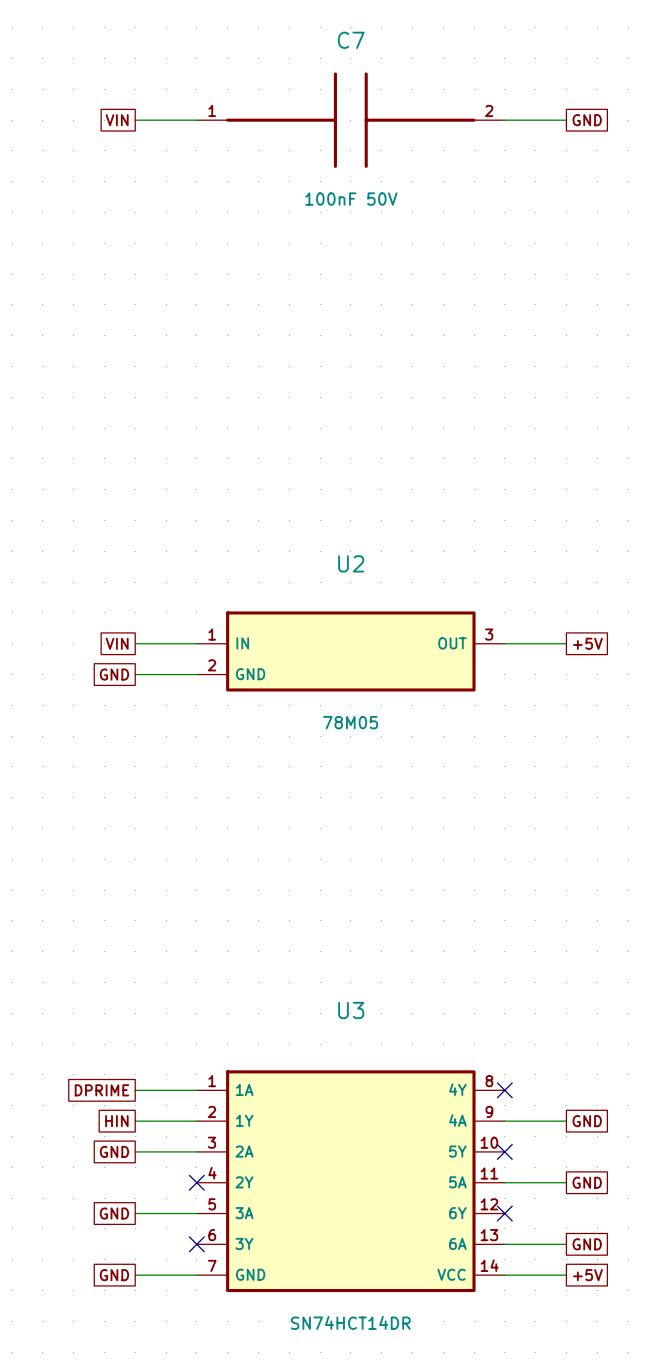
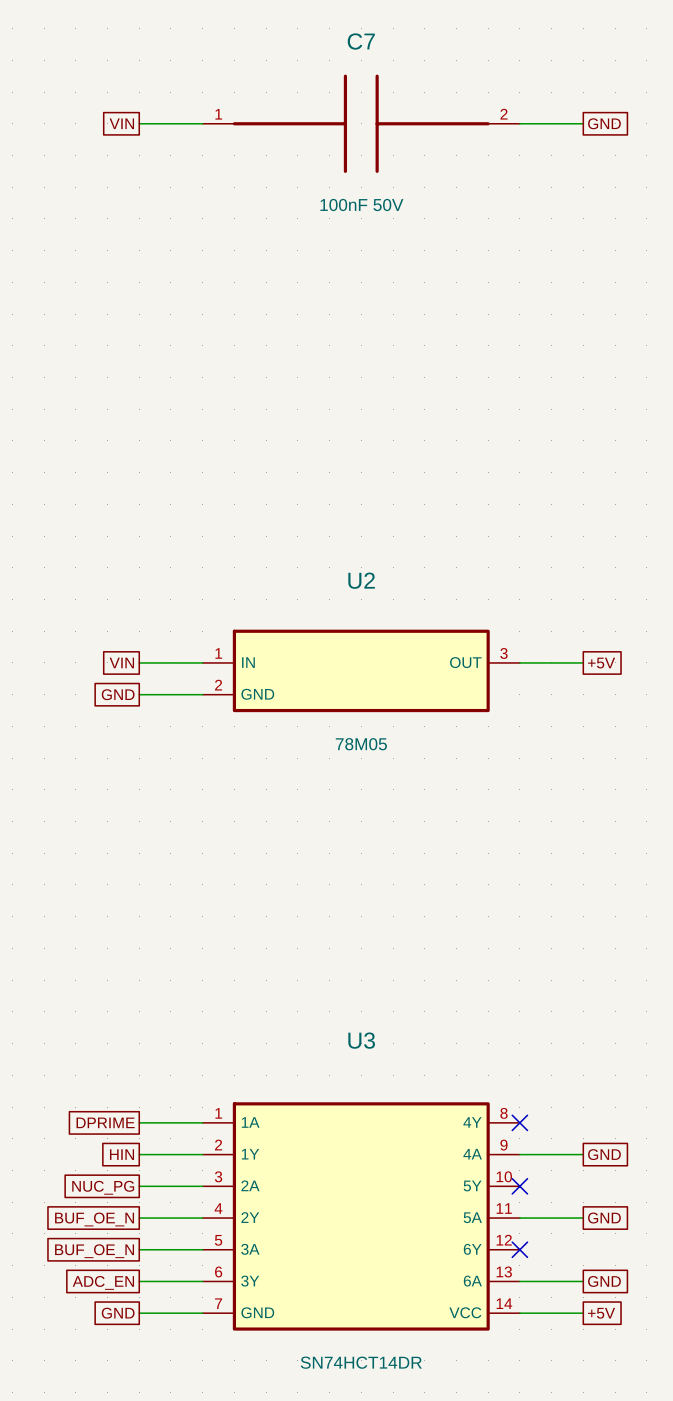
global label: GND (114, 1151) -> NUC_PG (103, 1187)
wire: none -> (139, 1218) (202, 1218)
no-connect mark: (196, 1182) -> none
global label: none -> BUF_OE_N (94, 1219)
global label: GND (114, 1213) -> BUF_OE_N (94, 1251)
global label: none -> ADC_EN (103, 1282)
wire: none -> (139, 1281) (202, 1281)
no-connect mark: (196, 1244) -> none

